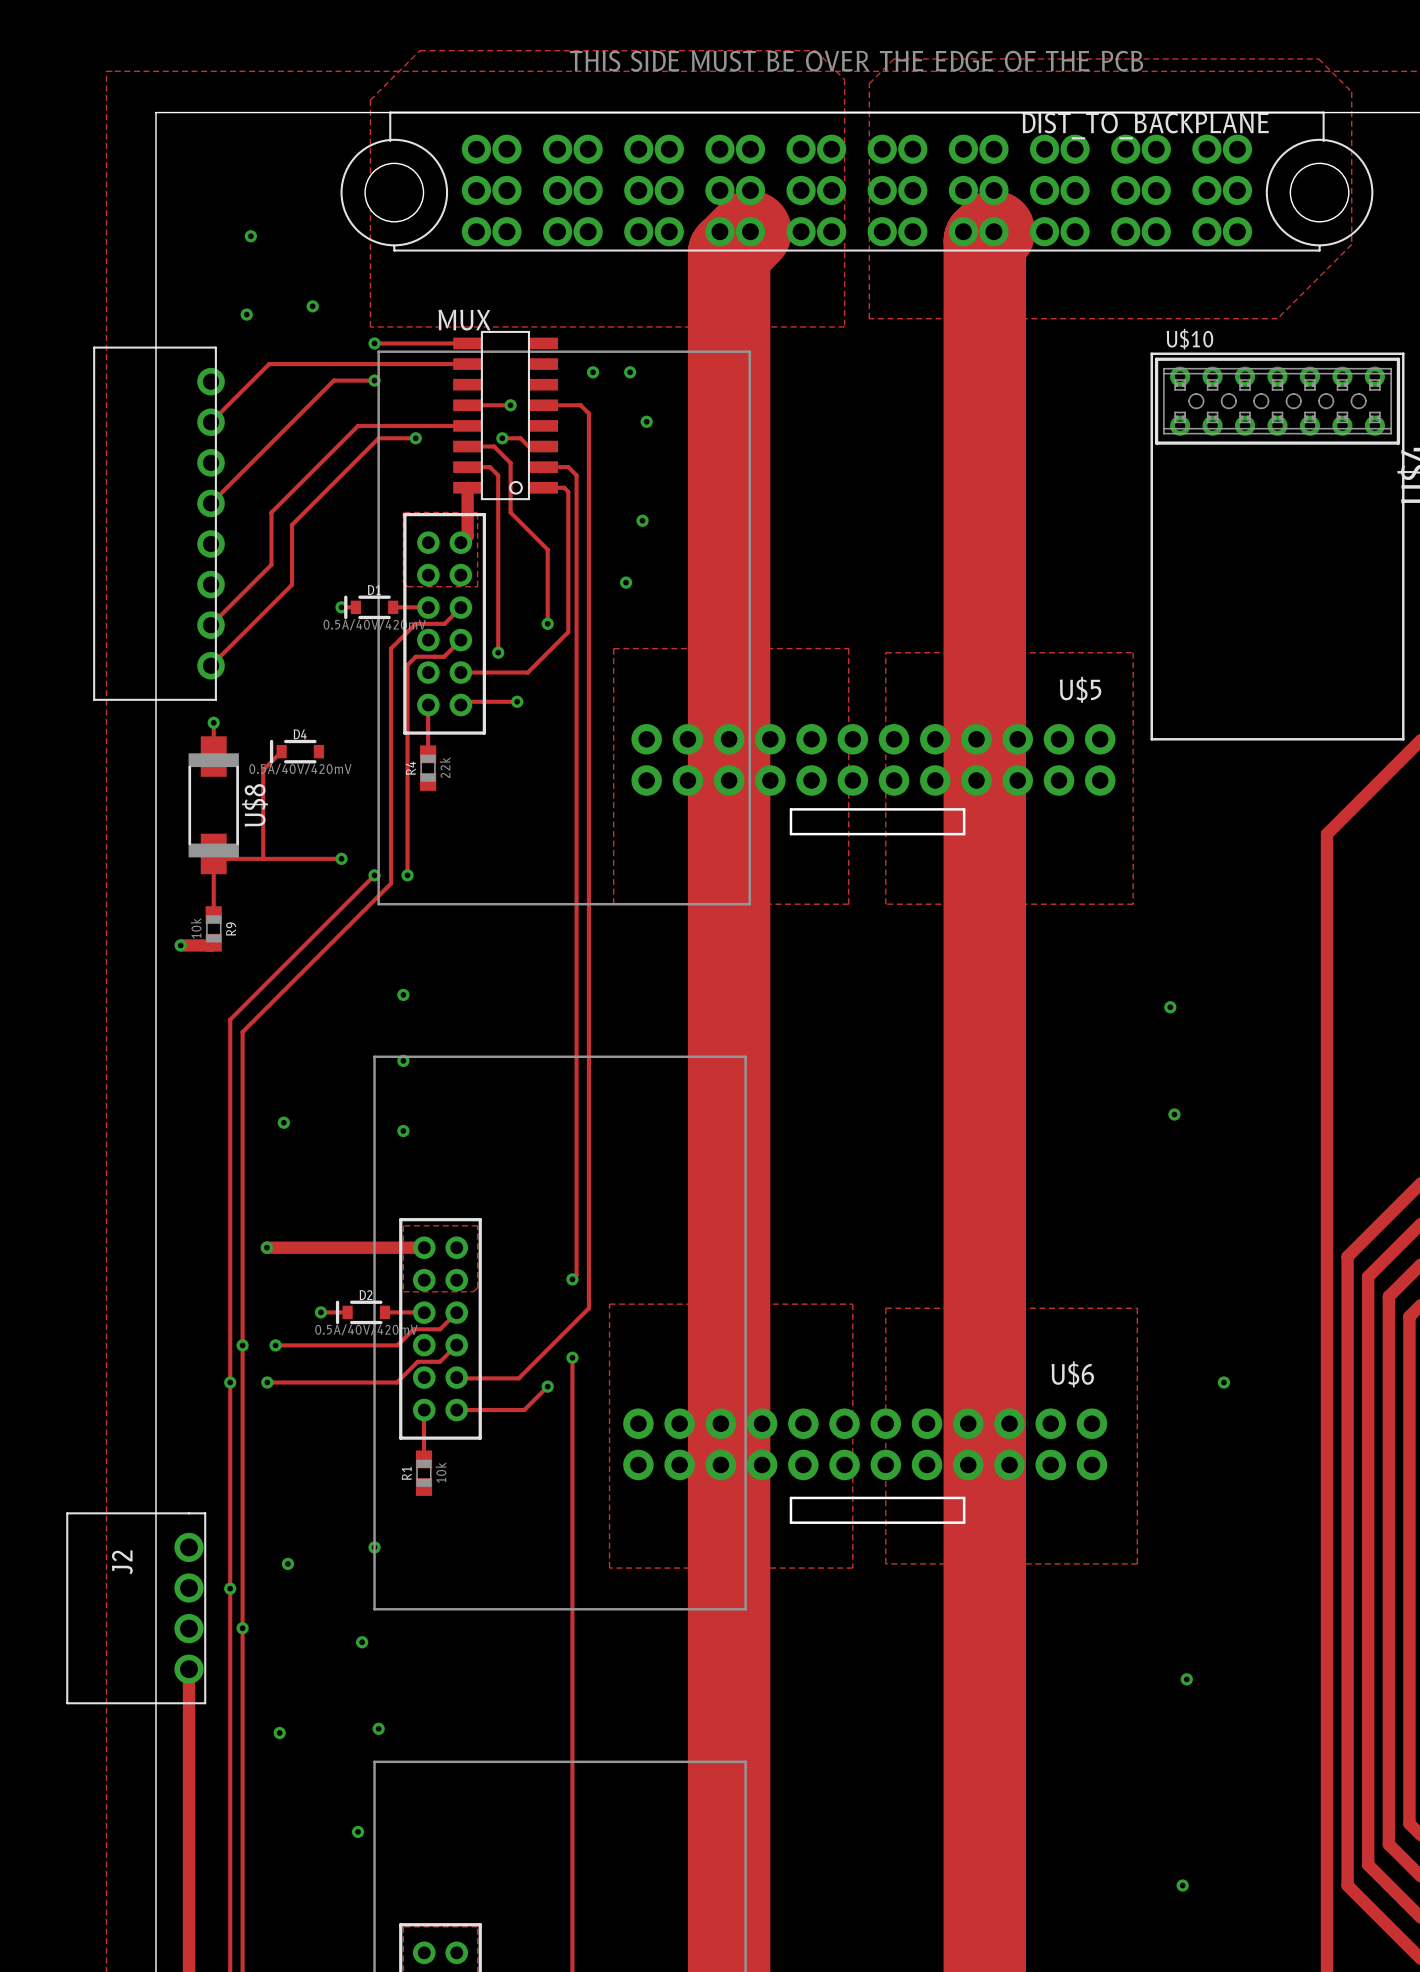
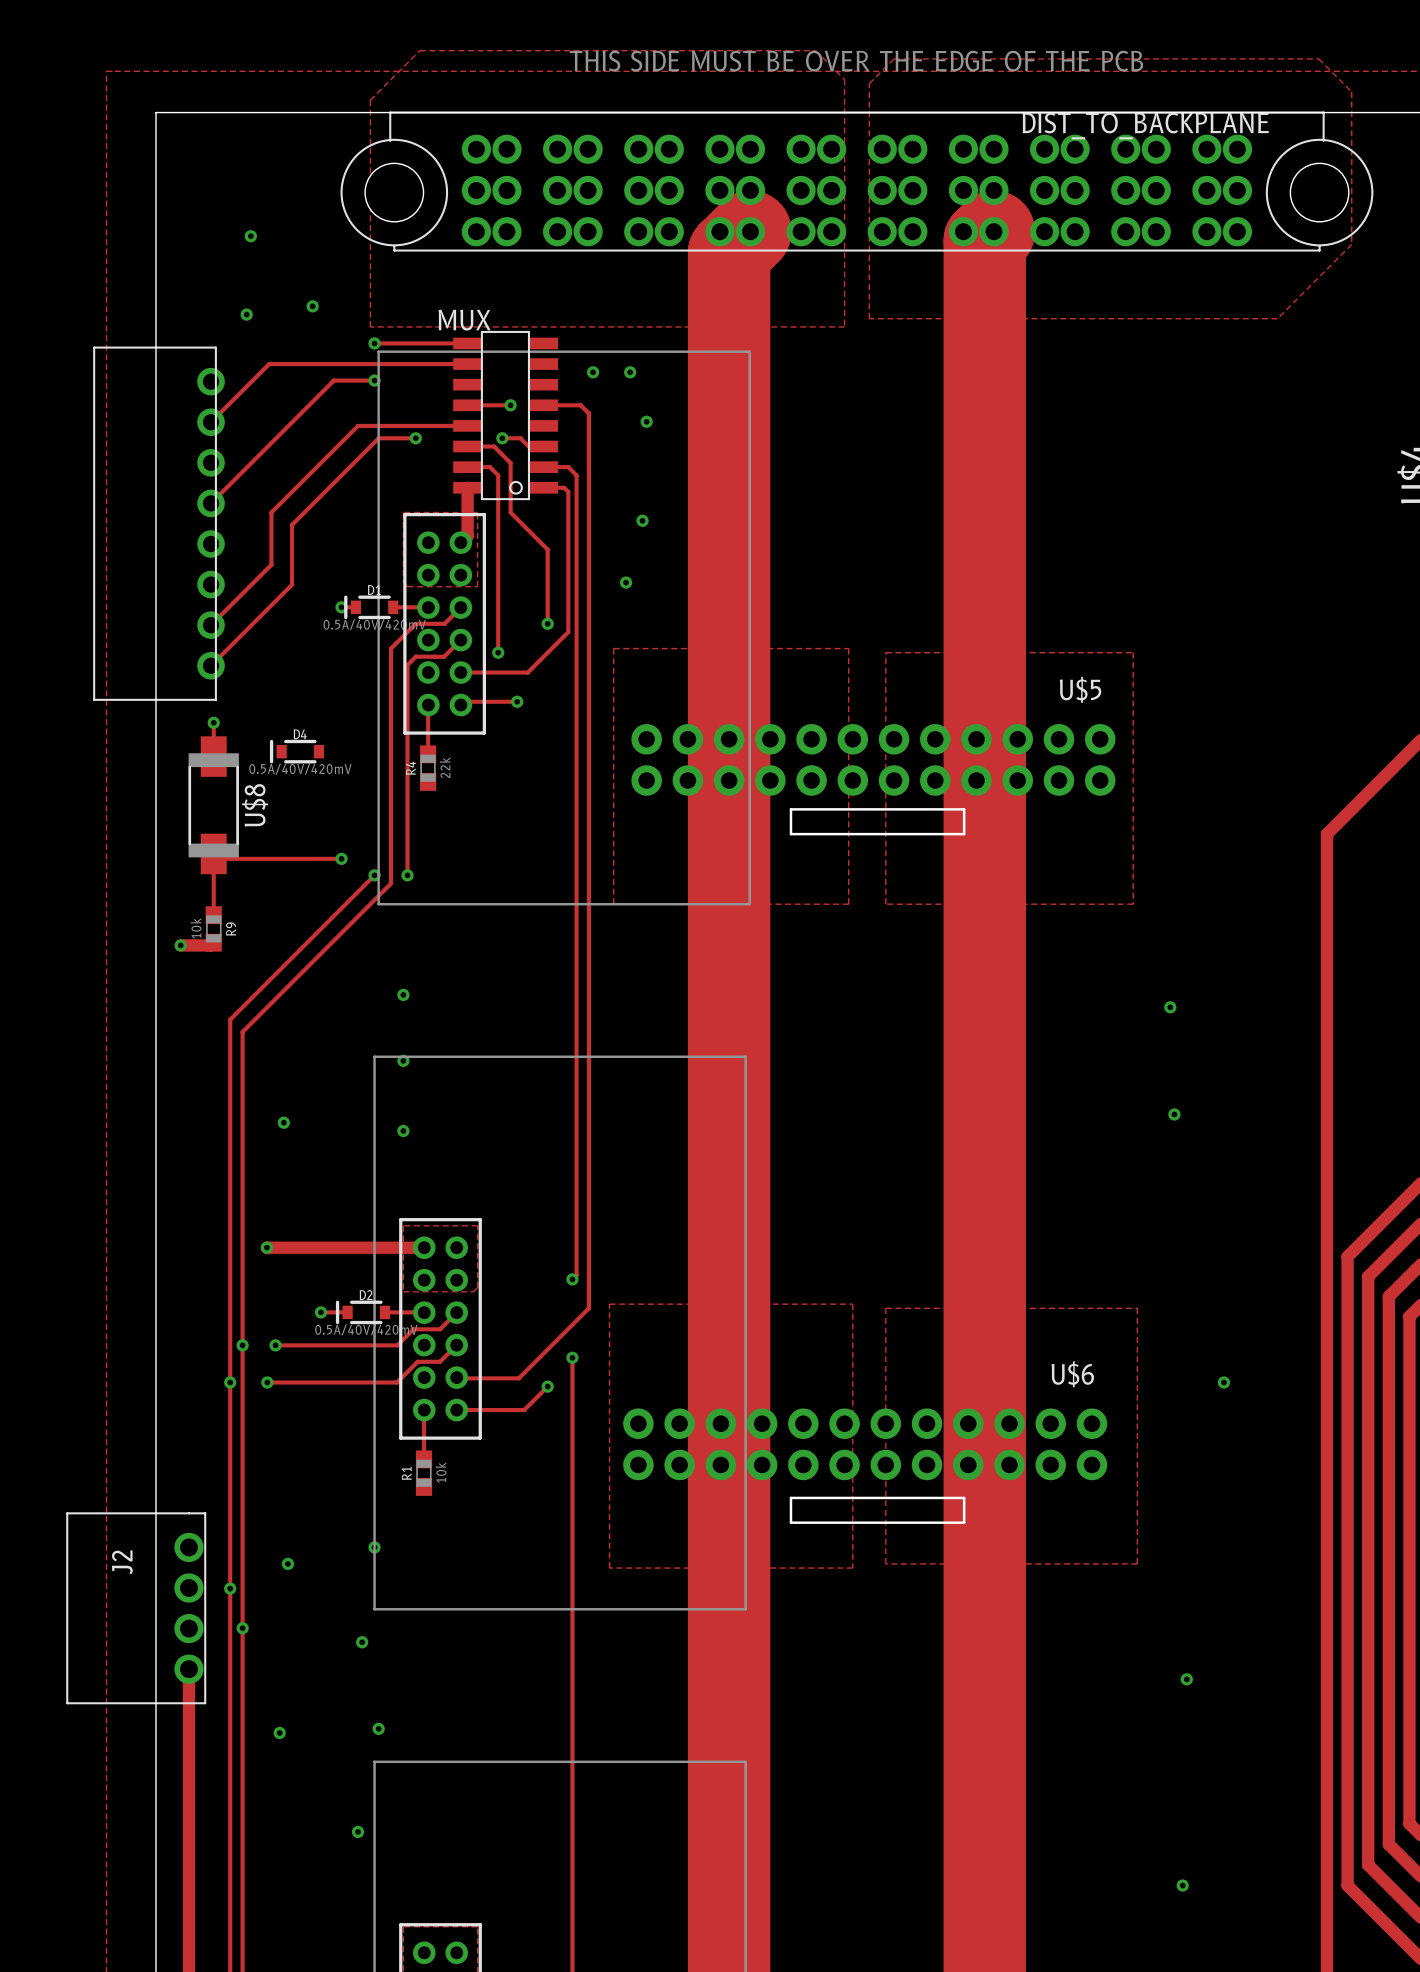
U$10: (1277, 546) -> none
track: (281, 751) (263, 770) (263, 858) -> none

